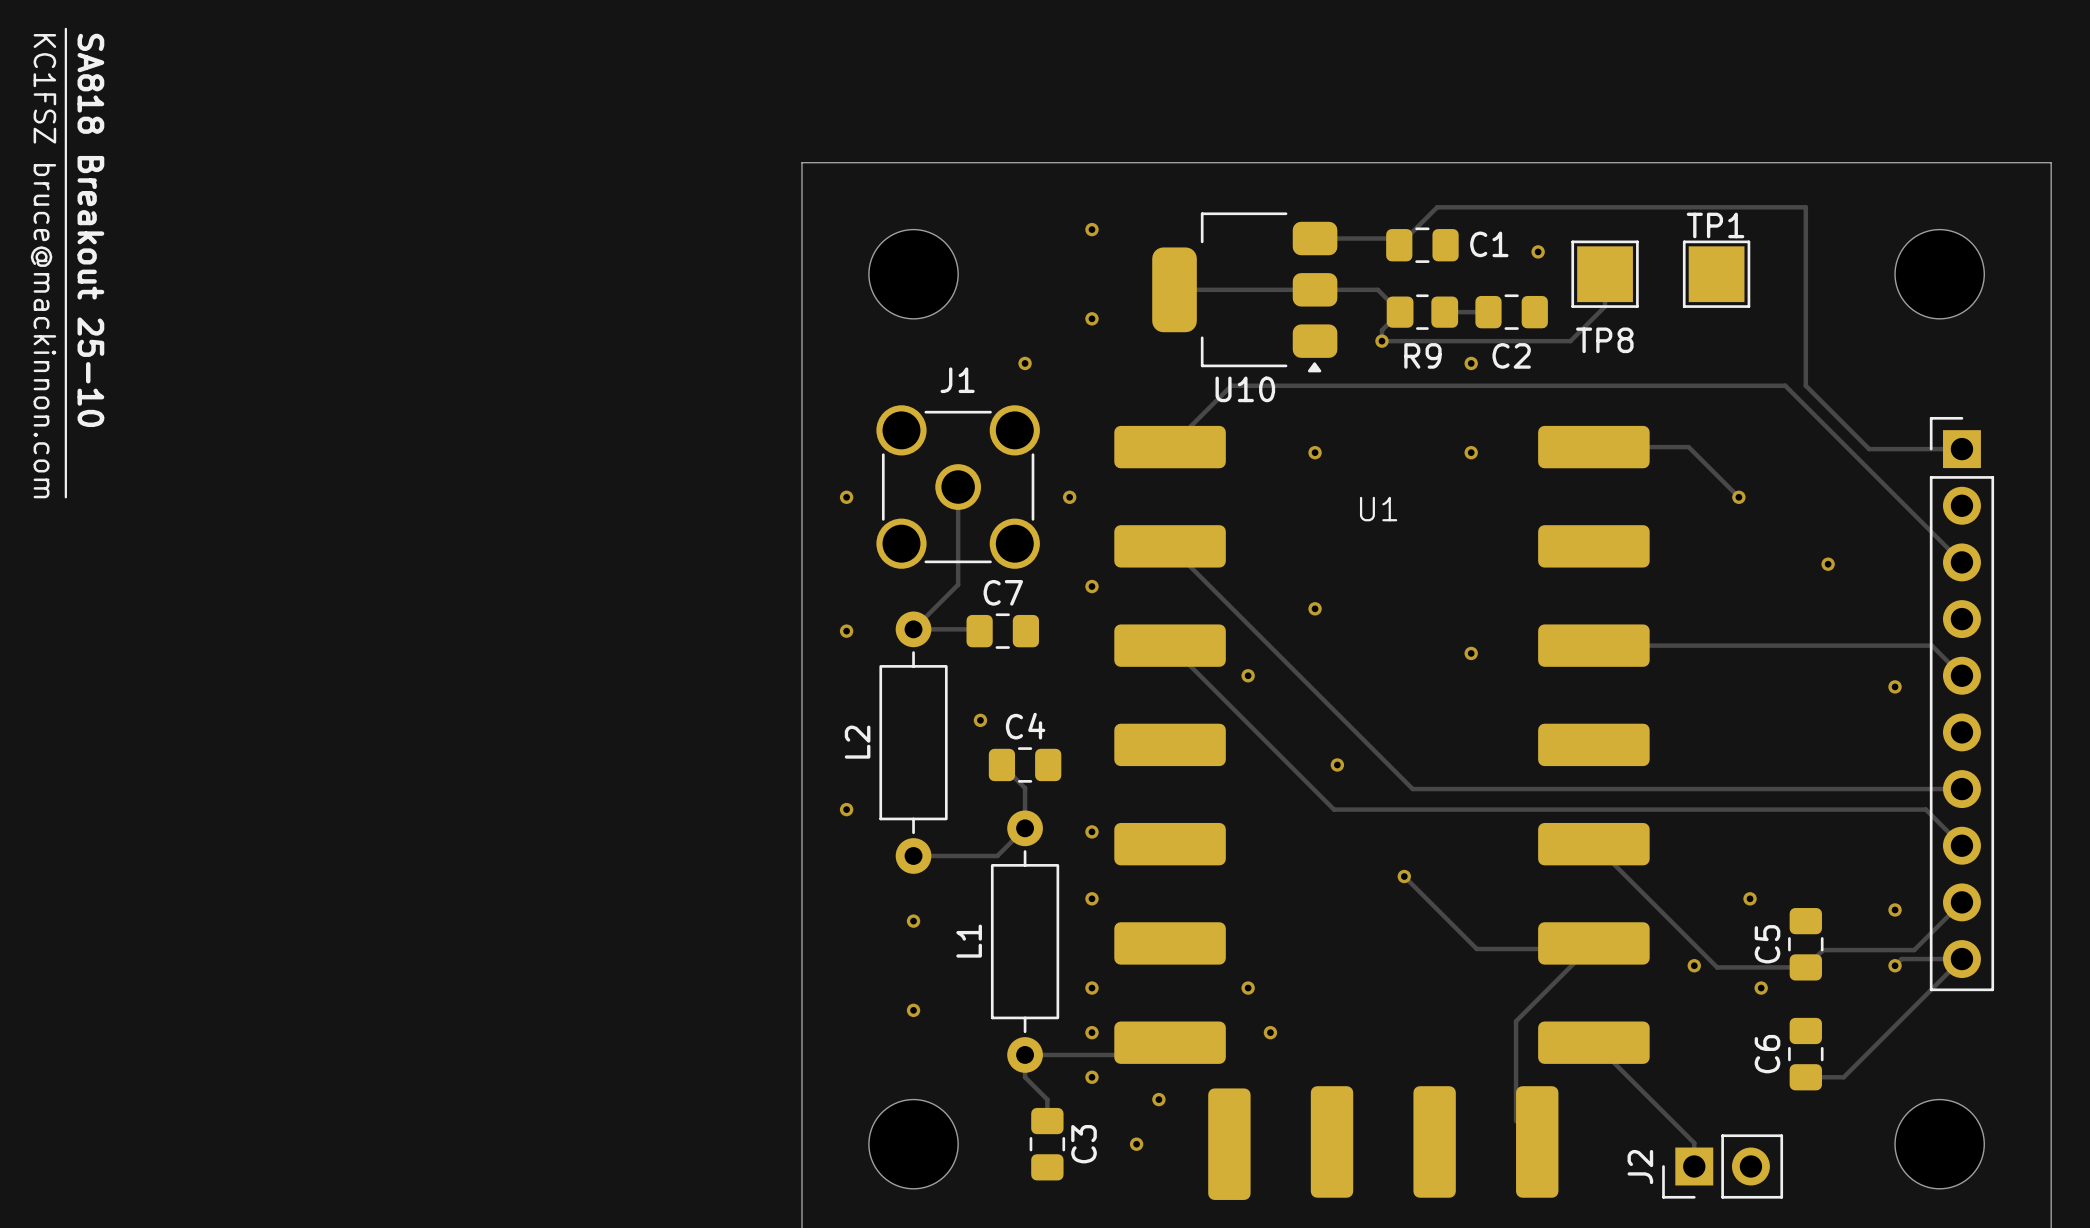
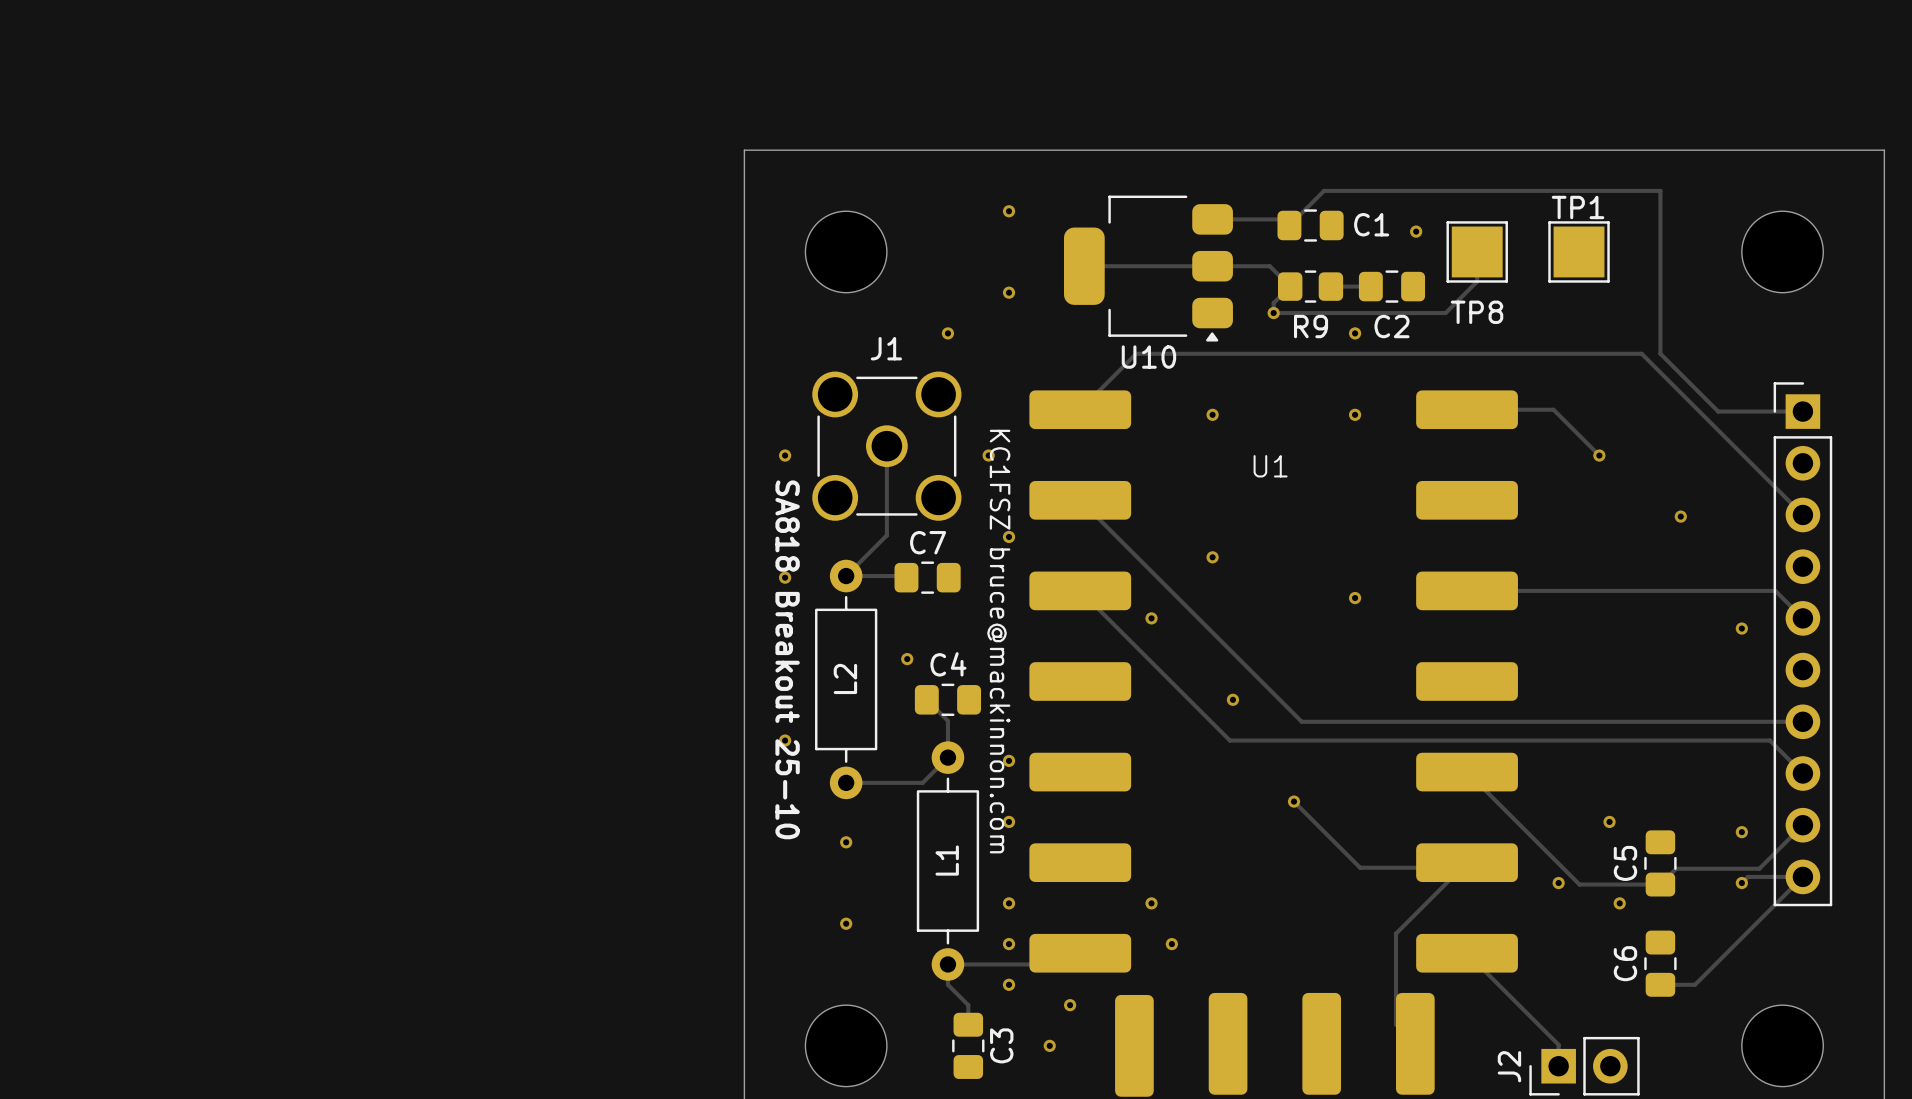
line: (65, 28) (65, 497) -> none
text: SA818 Breakout 25-10 (90, 230) -> none
text: KC1FSZ bruce@mackinnon.com (43, 266) -> none
text: none -> KC1FSZ bruce@mackinnon.com (998, 641)
text: none -> SA818 Breakout 25-10 (787, 659)
L2 name position: L2 (857, 742) -> L2 (845, 678)
L1 name position: L1 (969, 941) -> L1 (947, 860)

